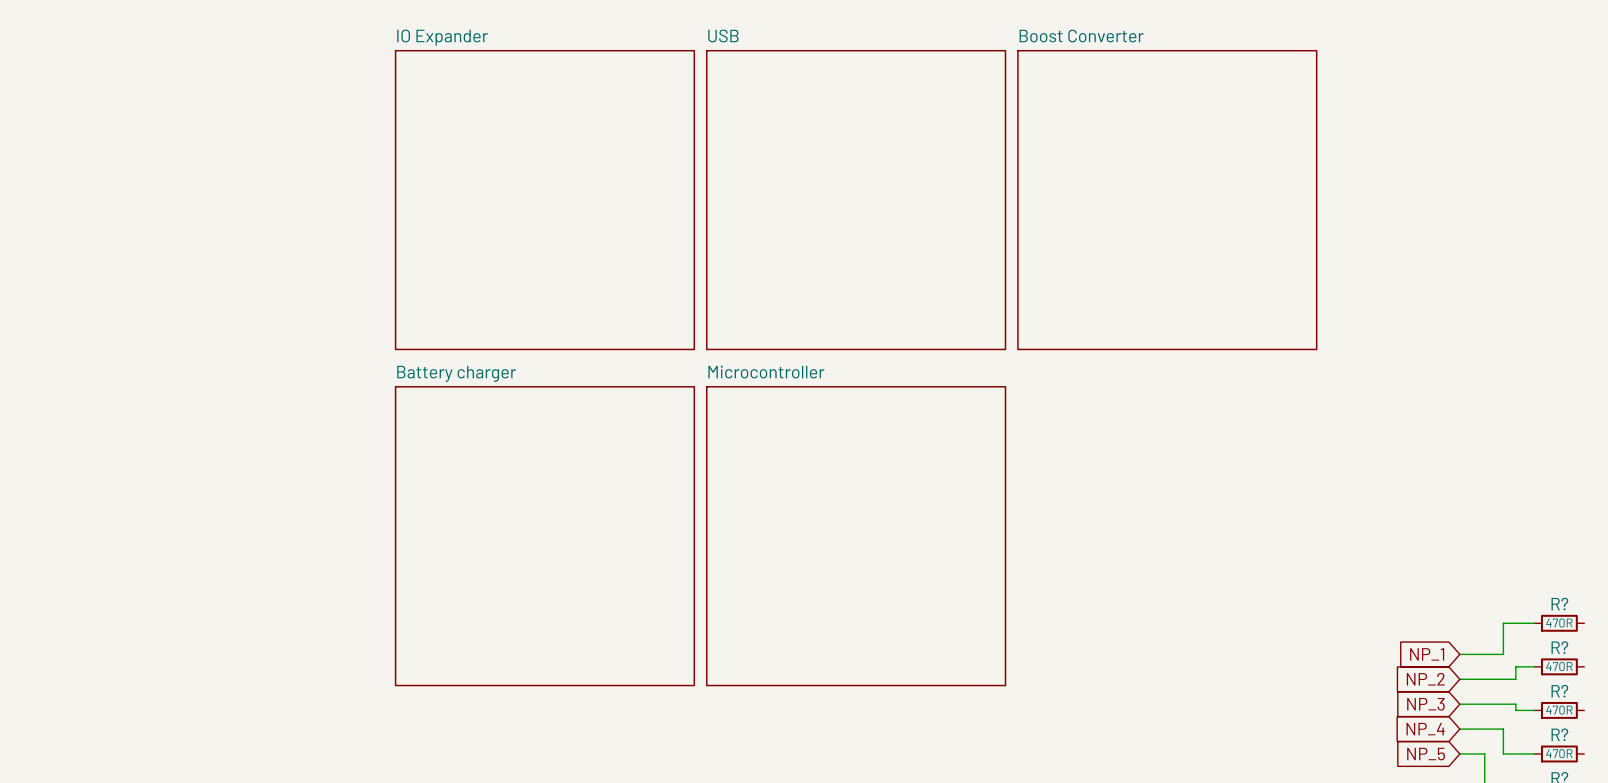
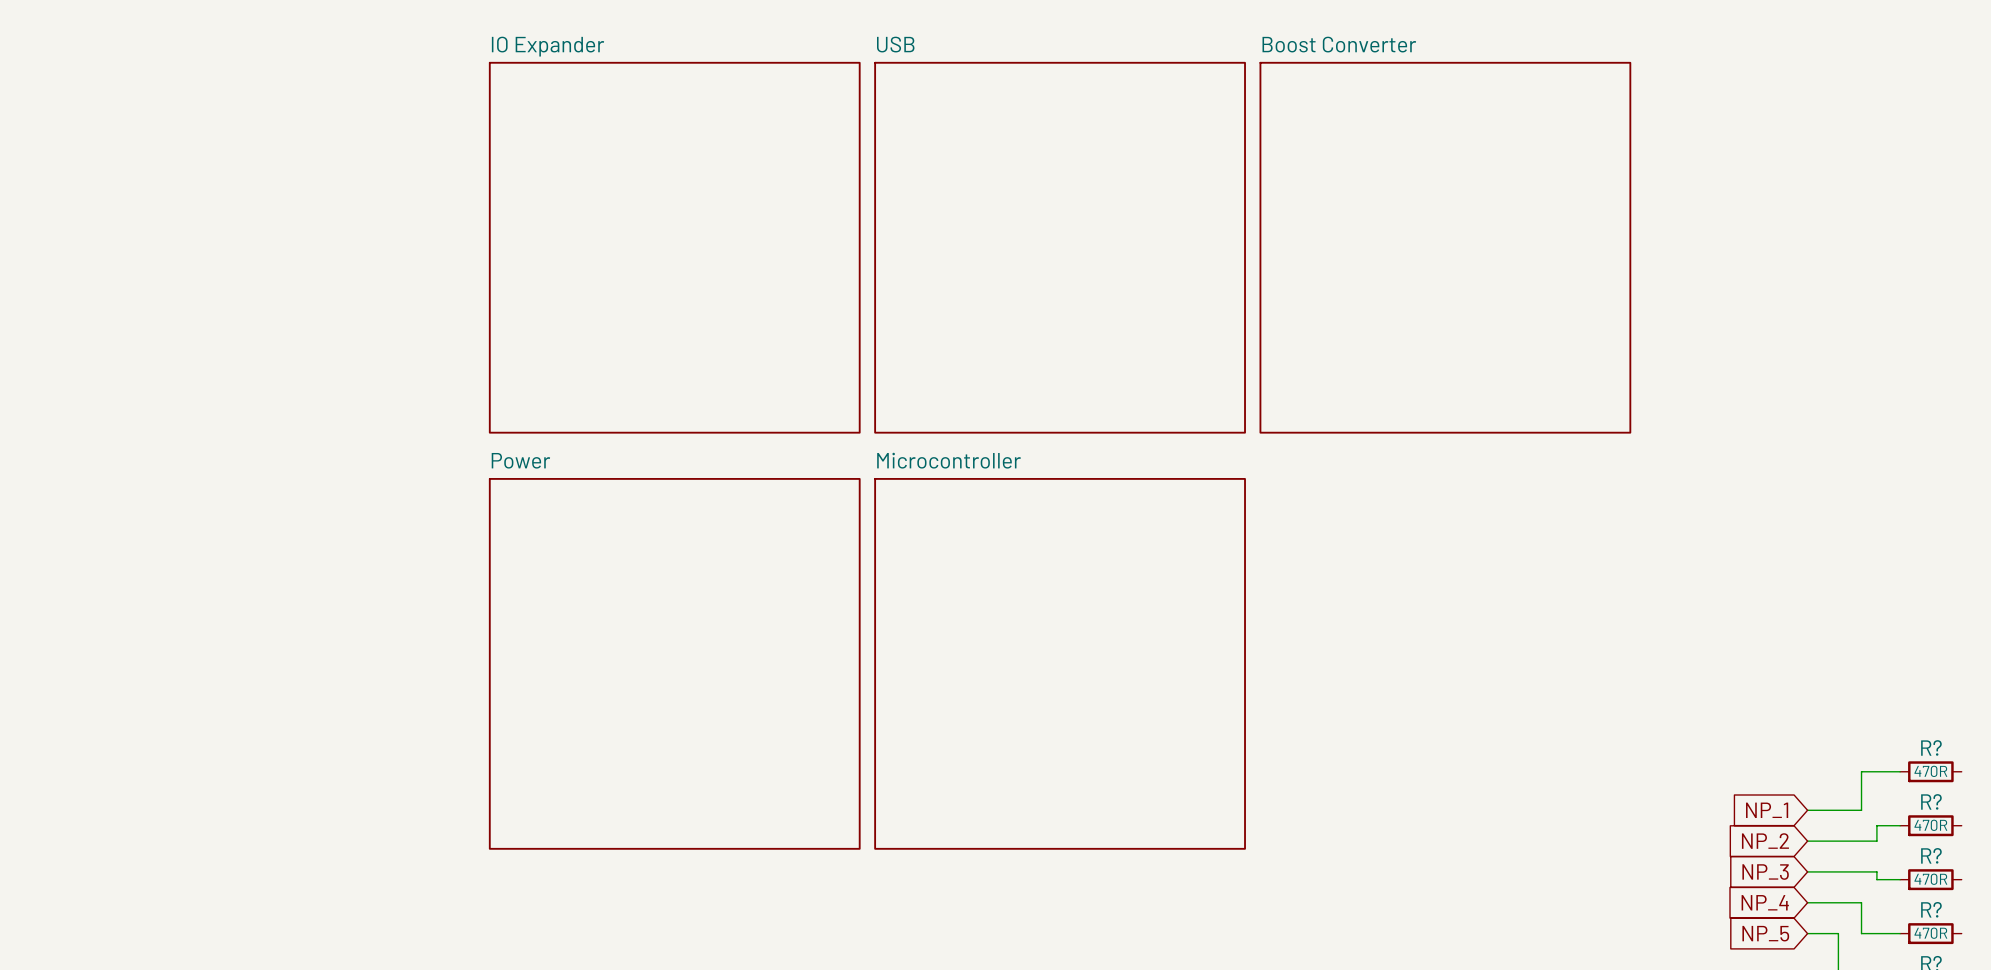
sheet Battery charger name: Battery charger (456, 373) -> Power (520, 460)

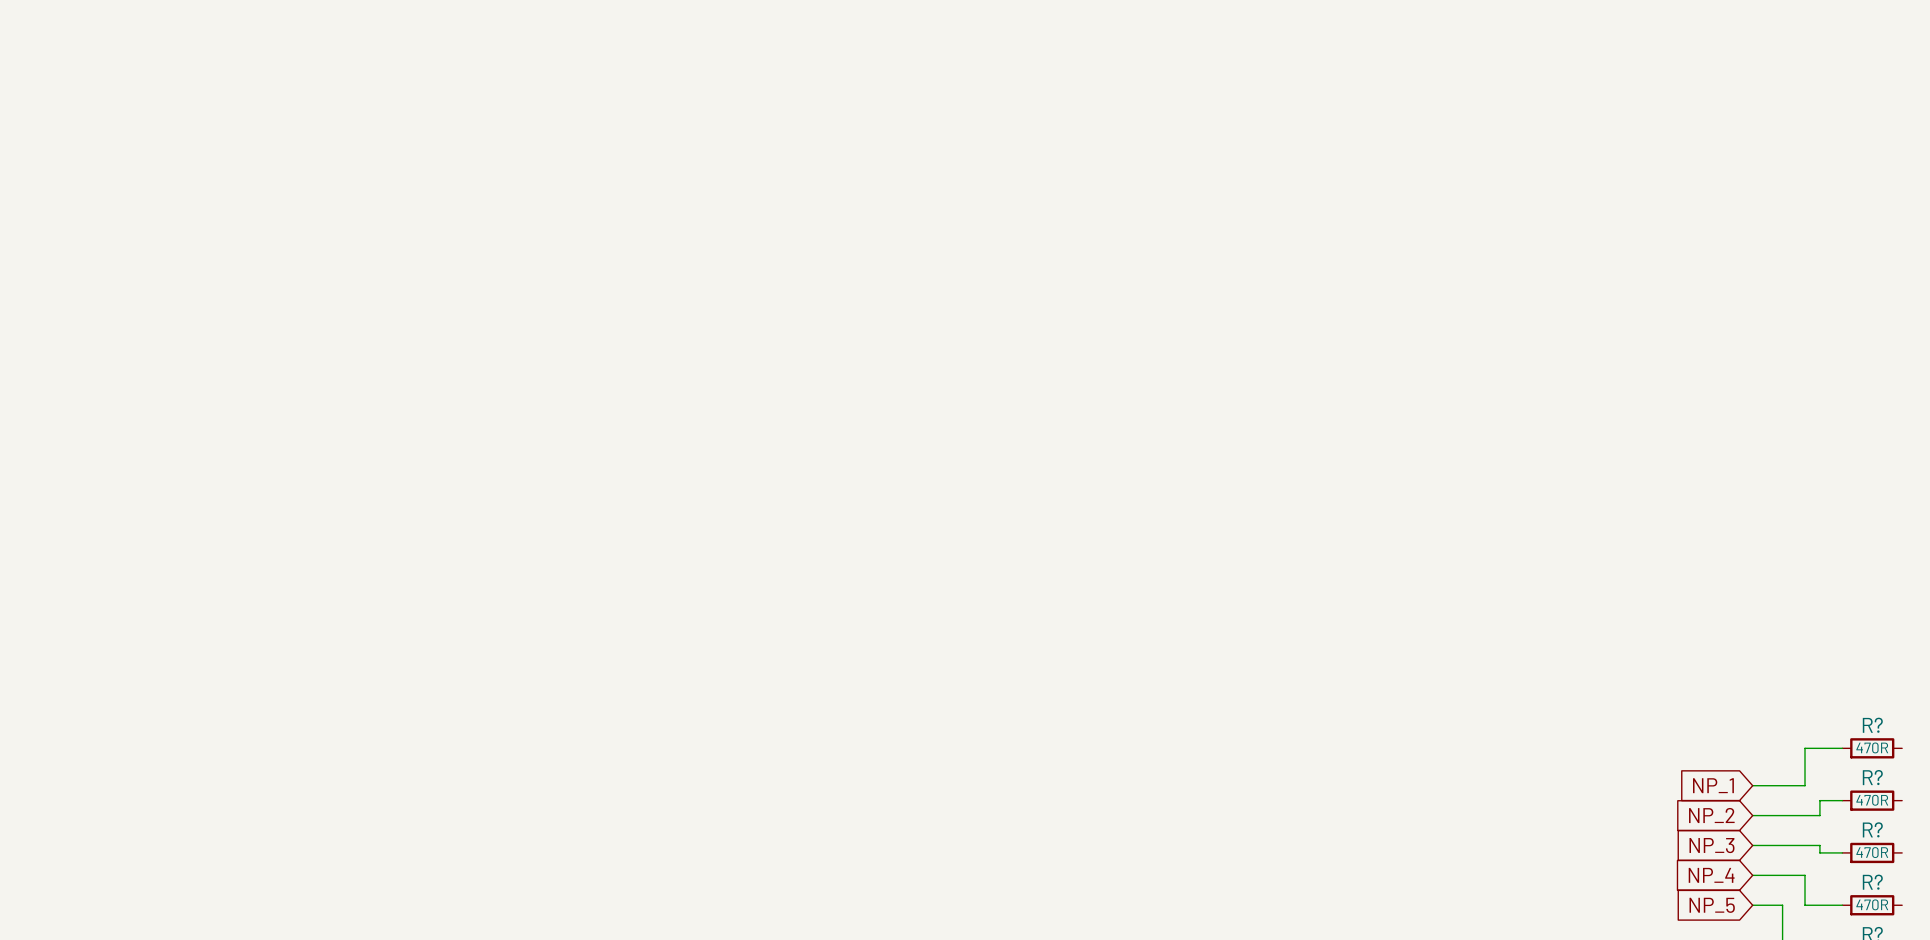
sheet IO Expander: (674, 247) -> none
sheet USB: (1060, 247) -> none
sheet Boost Converter: (1445, 247) -> none
sheet Power: (674, 663) -> none
sheet Microcontroller: (1060, 663) -> none

